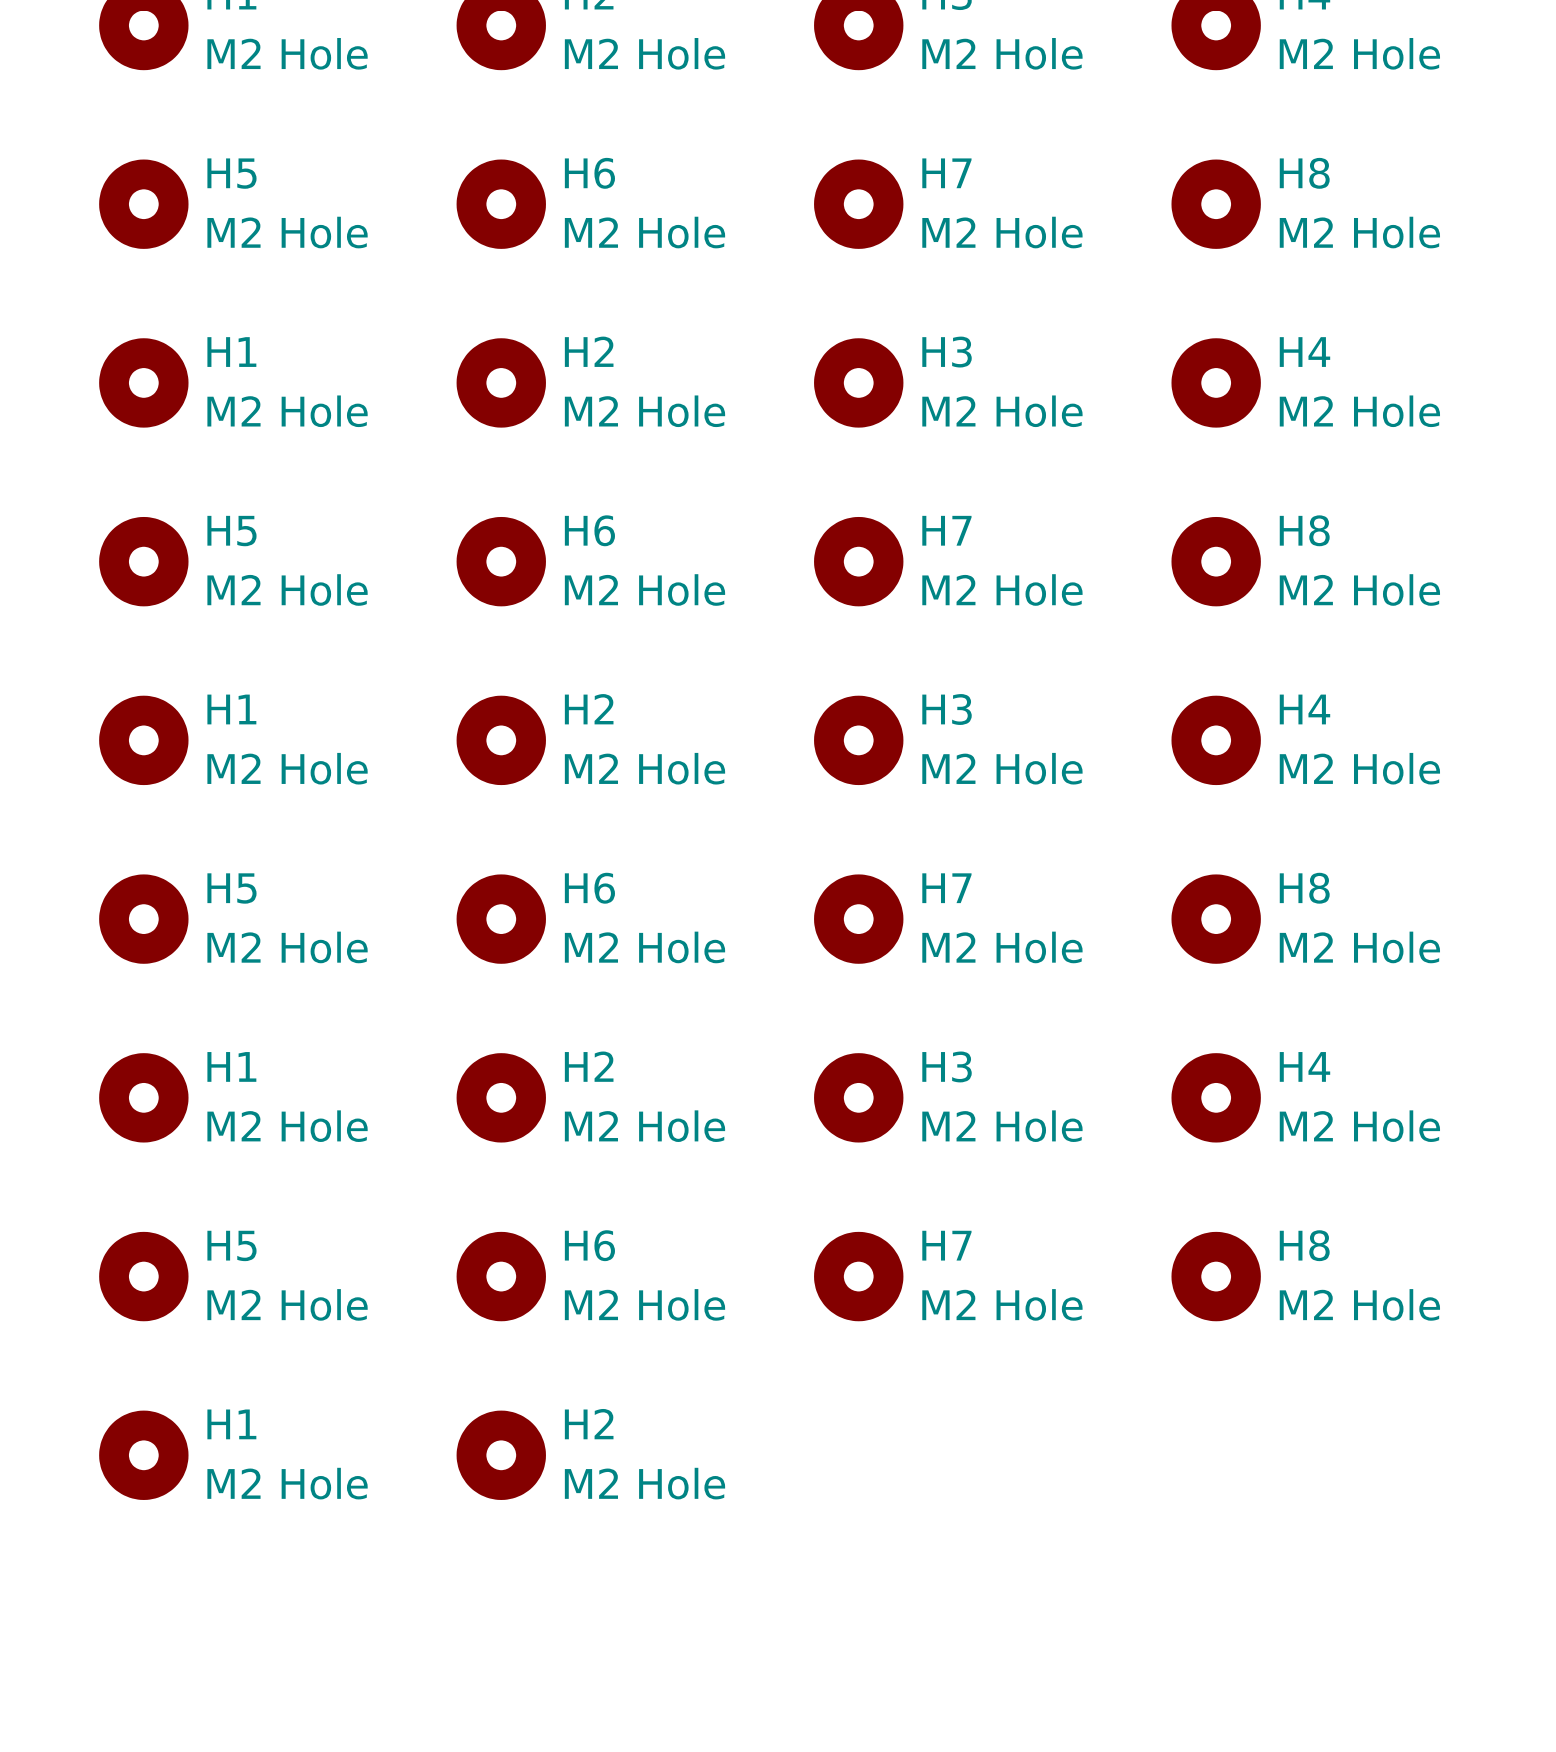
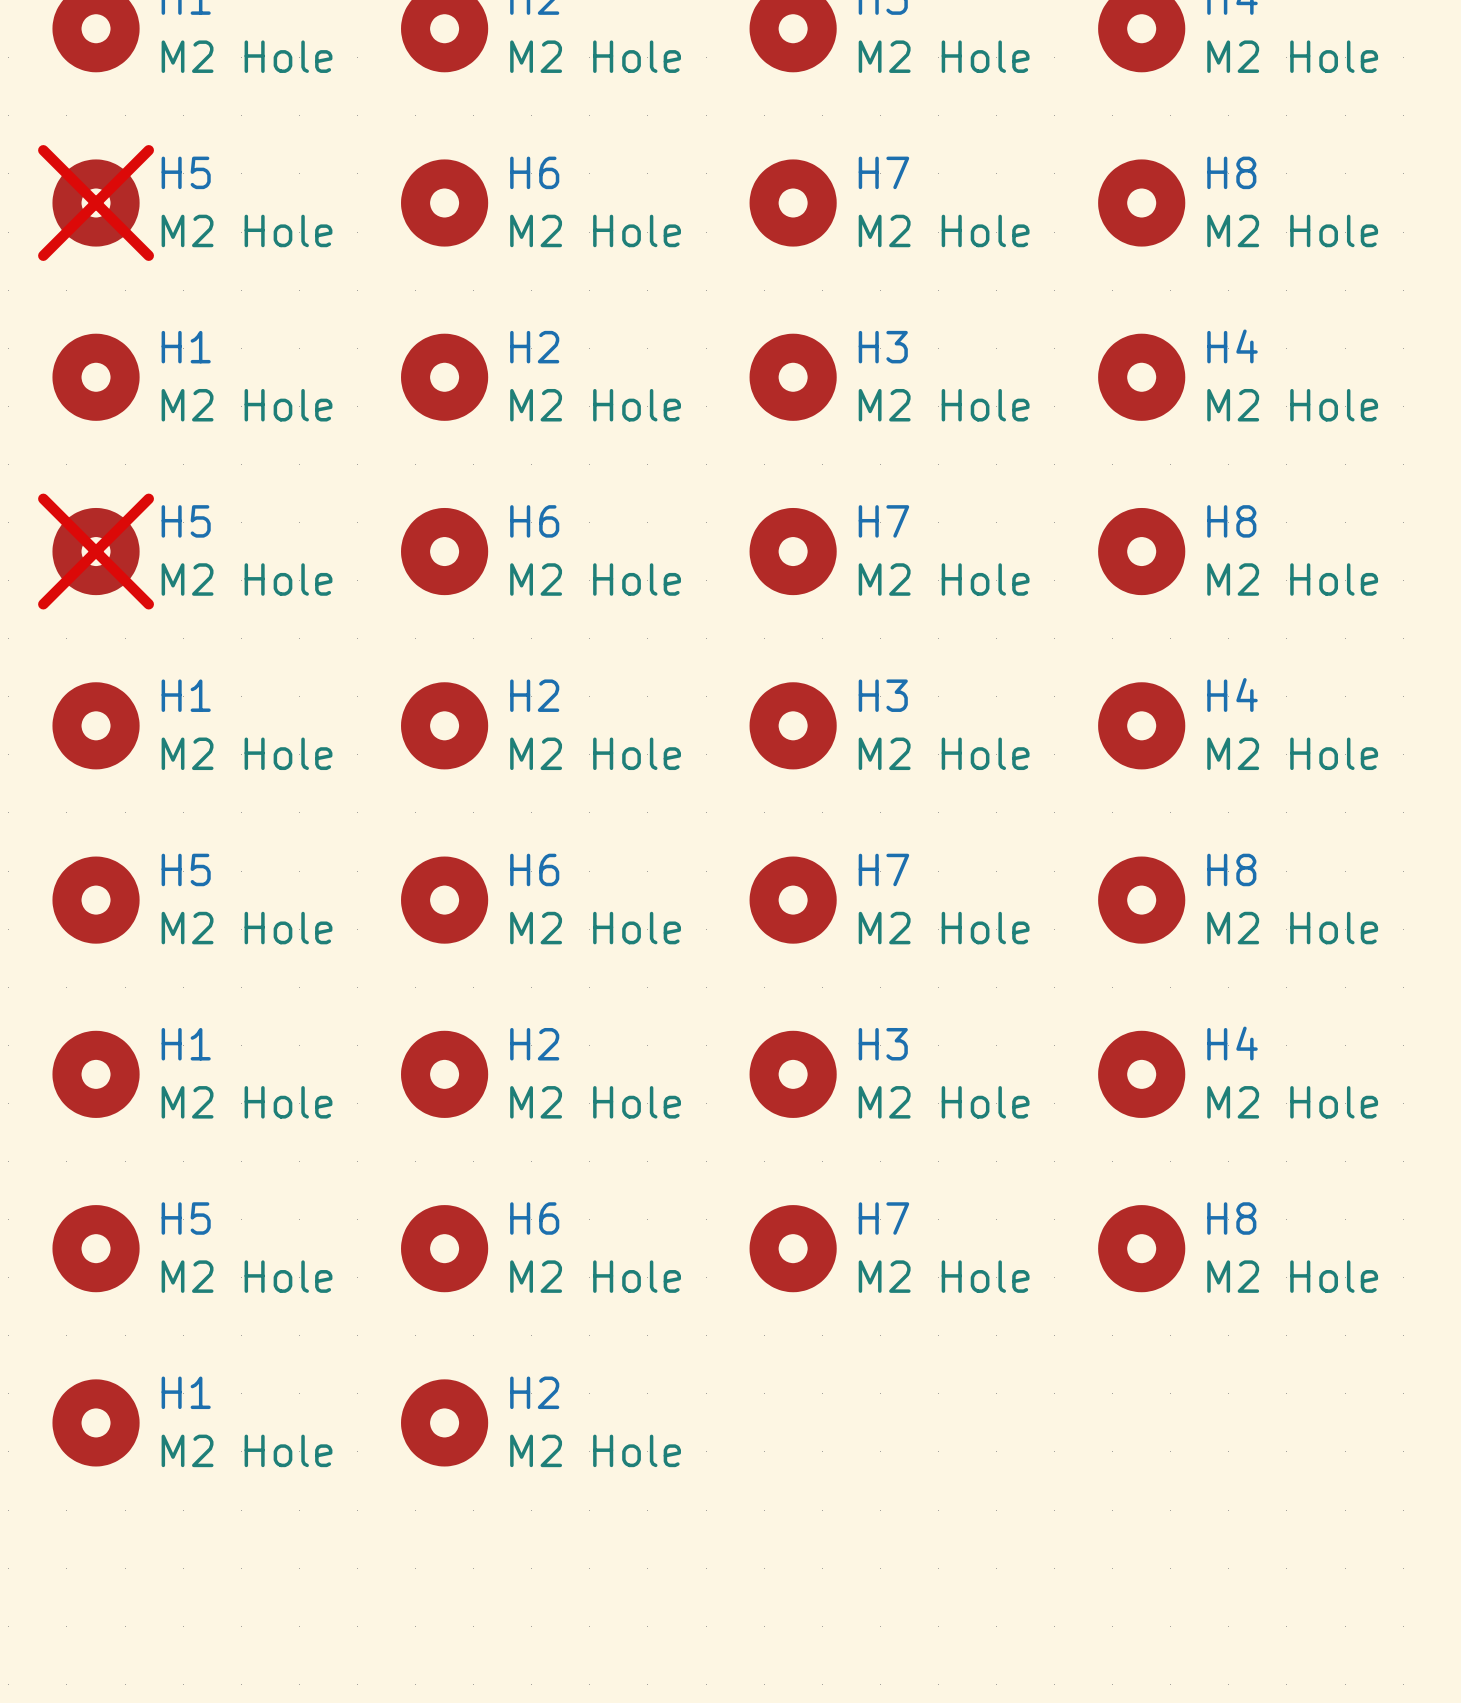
H5 do-not-place cross: none -> (96, 203)
H5 do-not-place cross: none -> (96, 551)

